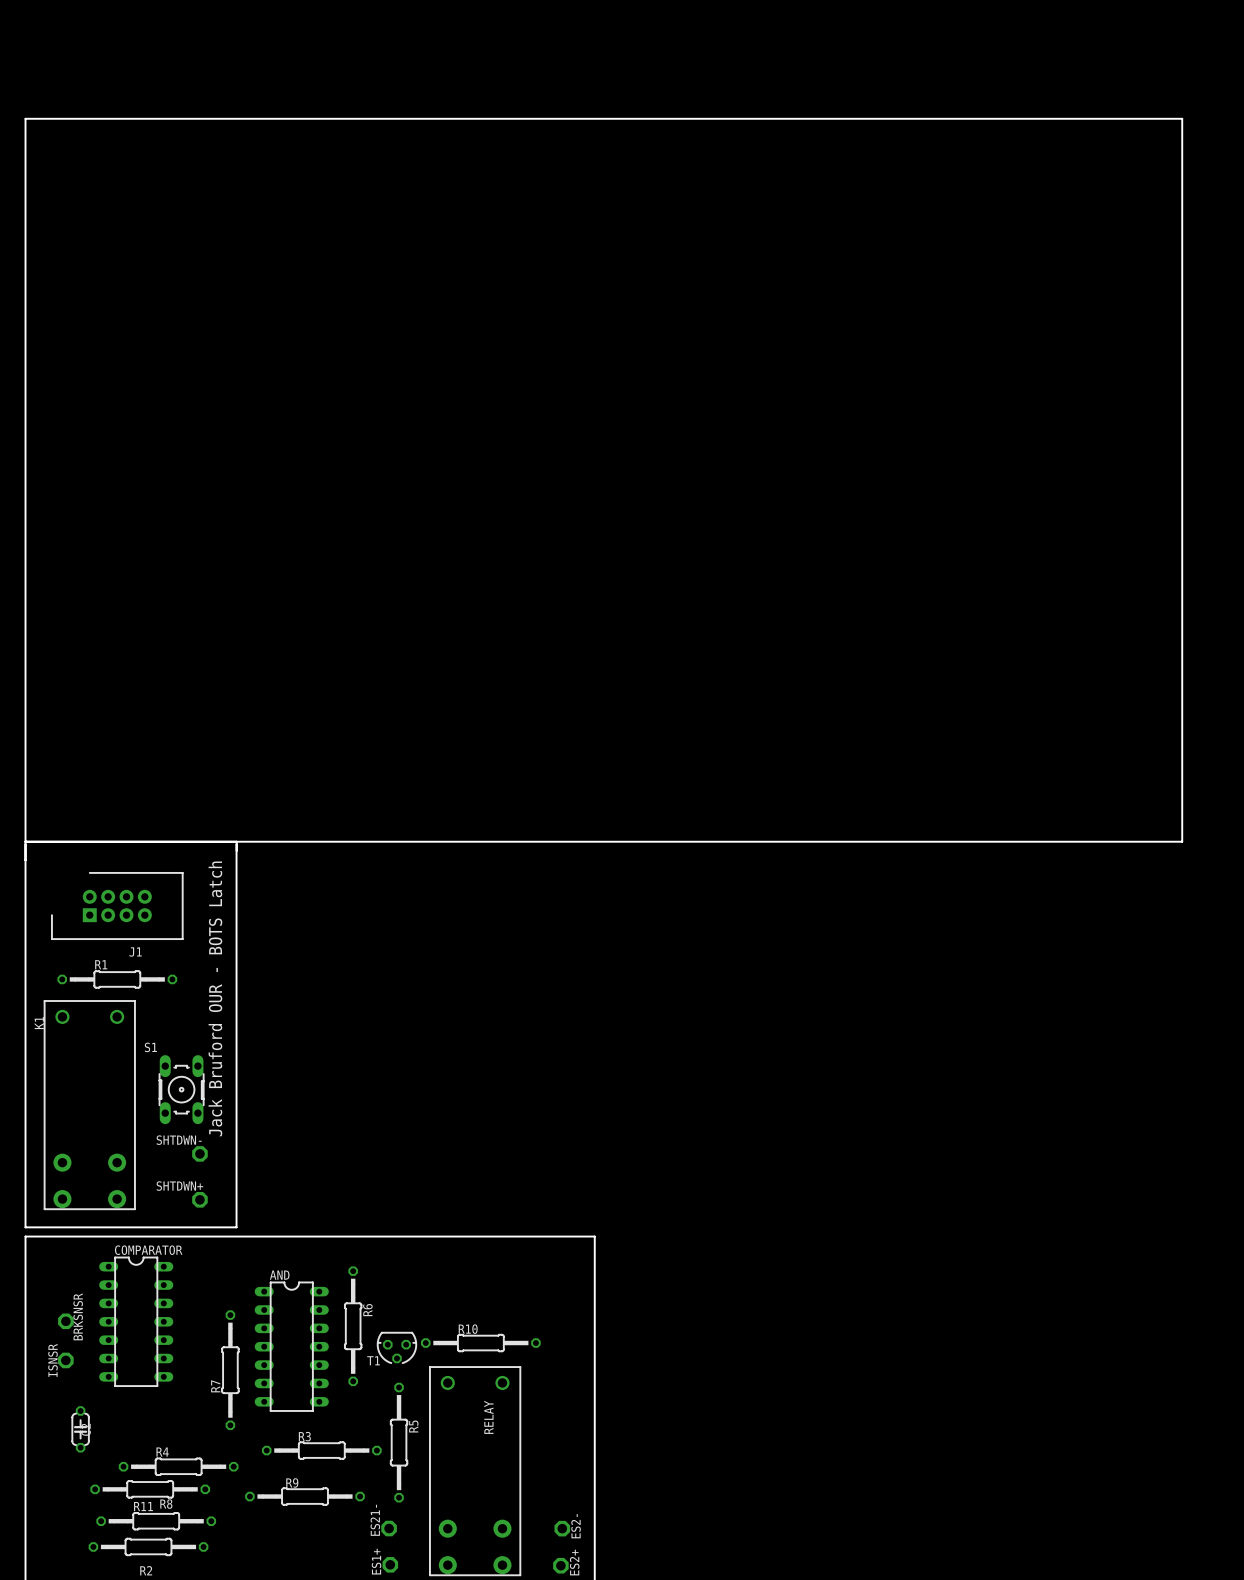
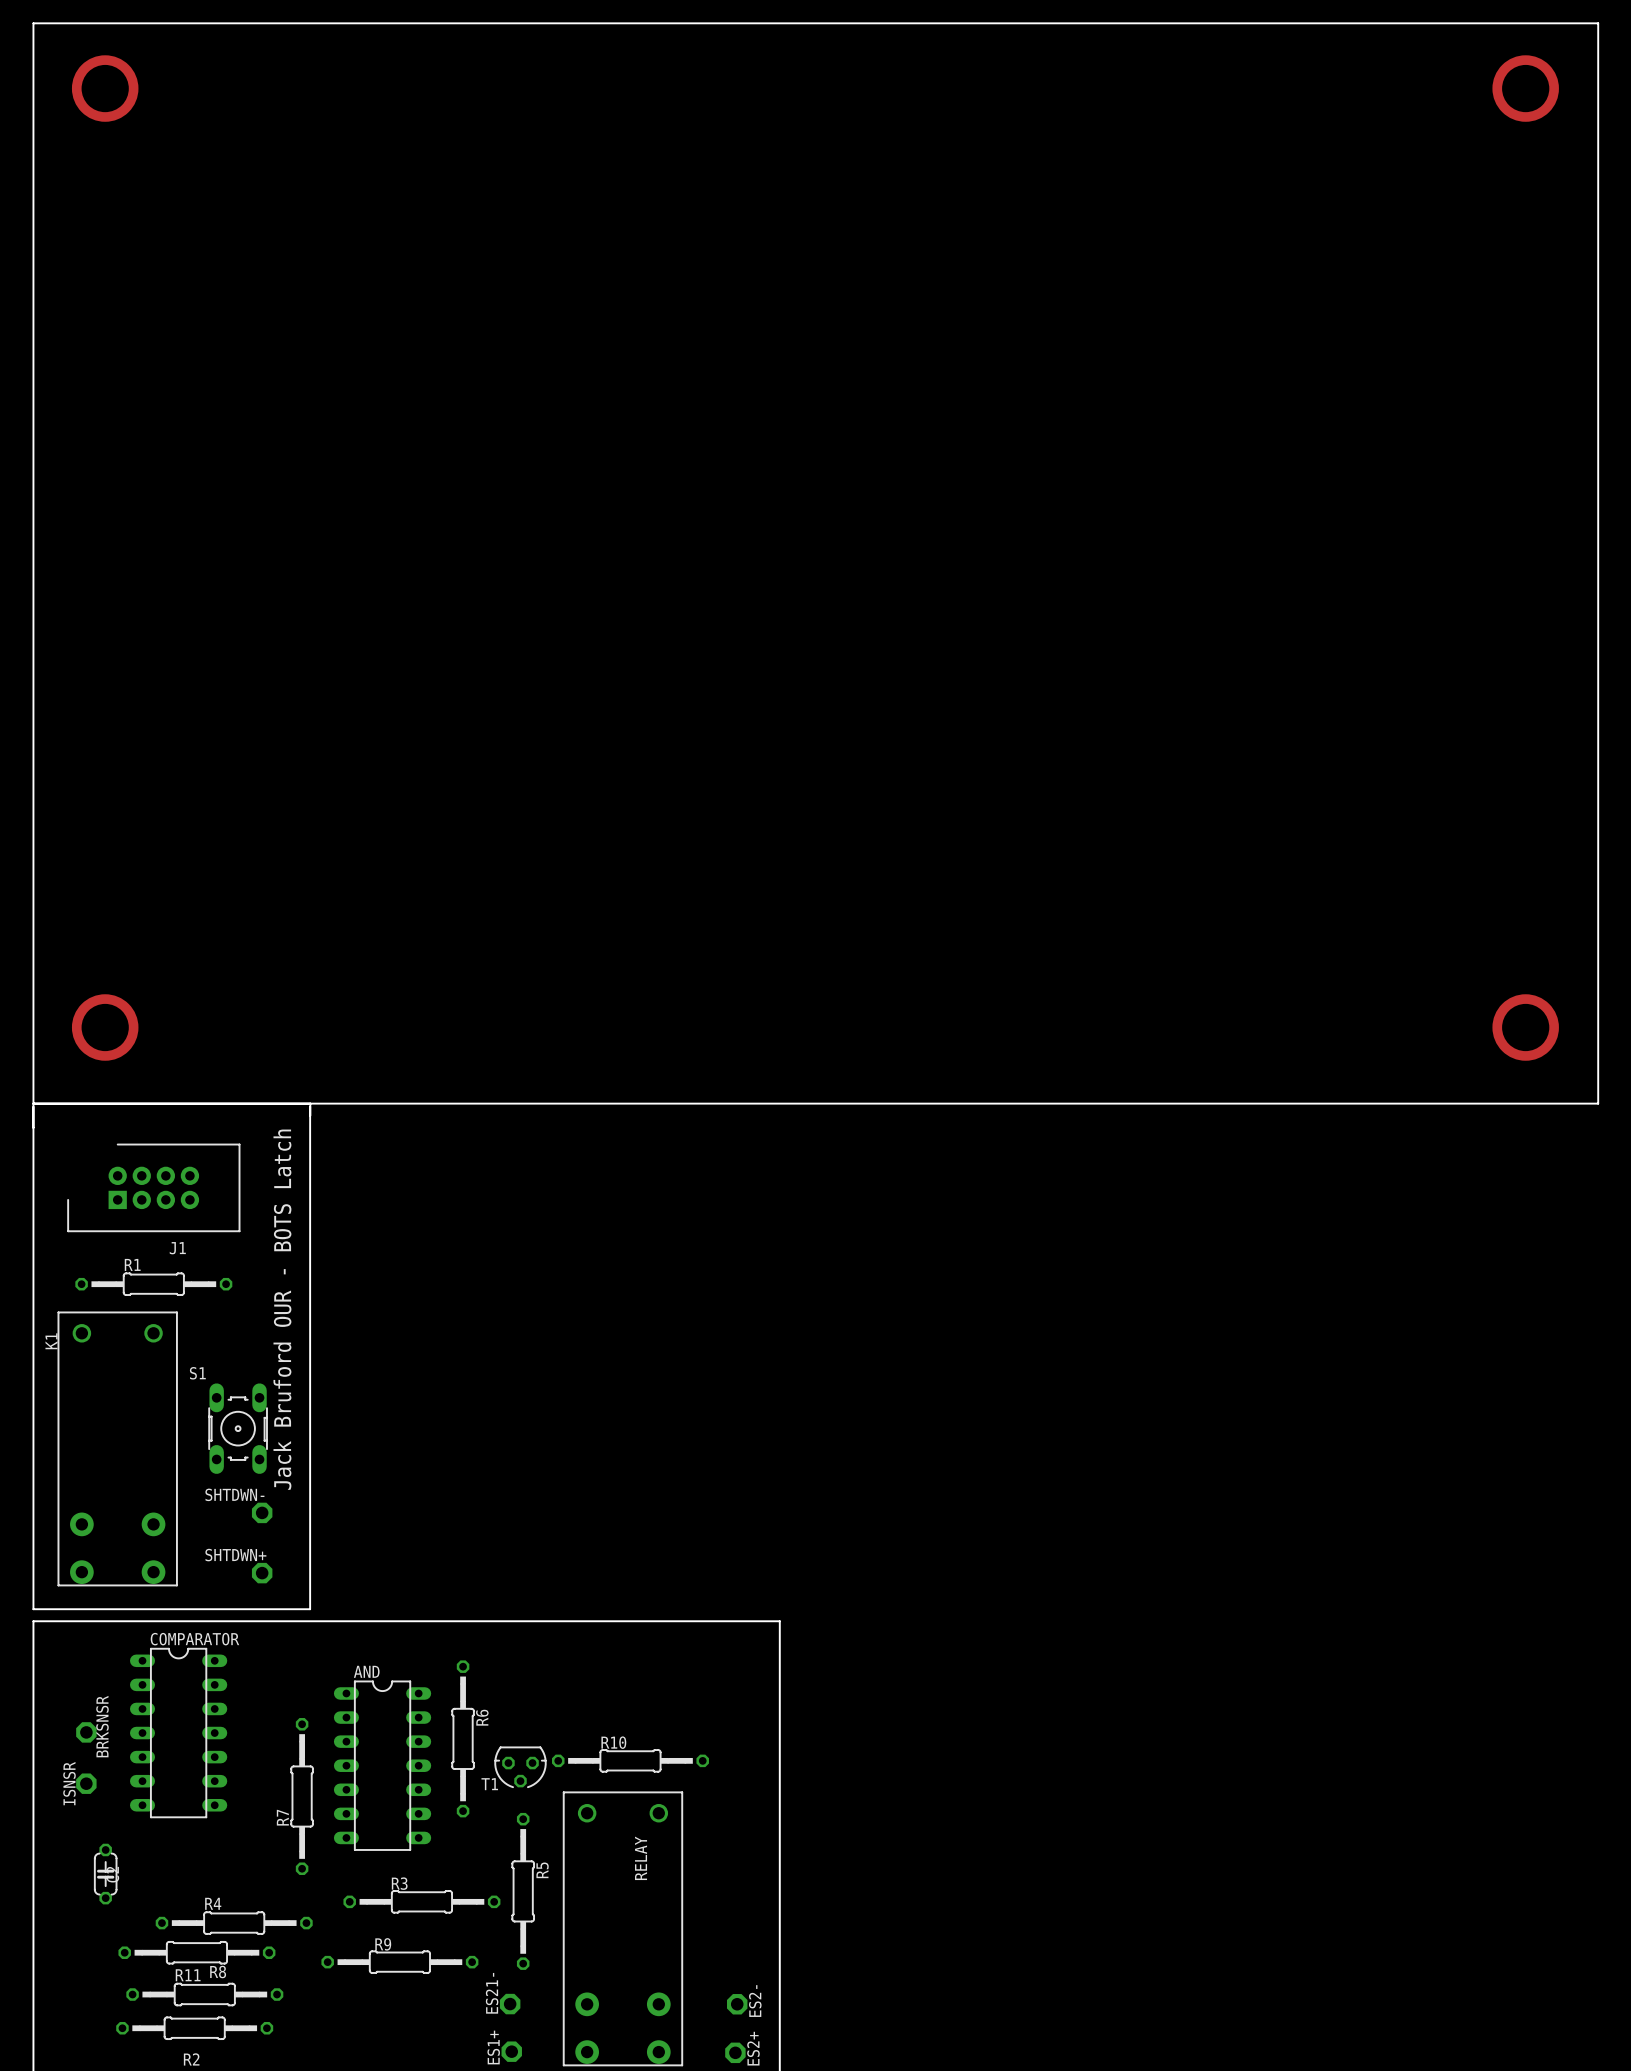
drawing: none -> [71, 55, 139, 122]
drawing: none -> [1492, 55, 1559, 122]
board edge: (25, 118) (1182, 118) (1182, 841) -> (33, 155) (33, 23) (1598, 23) (1598, 1103) (1550, 1103)
drawing: none -> [71, 994, 139, 1061]
drawing: none -> [1492, 994, 1559, 1061]

